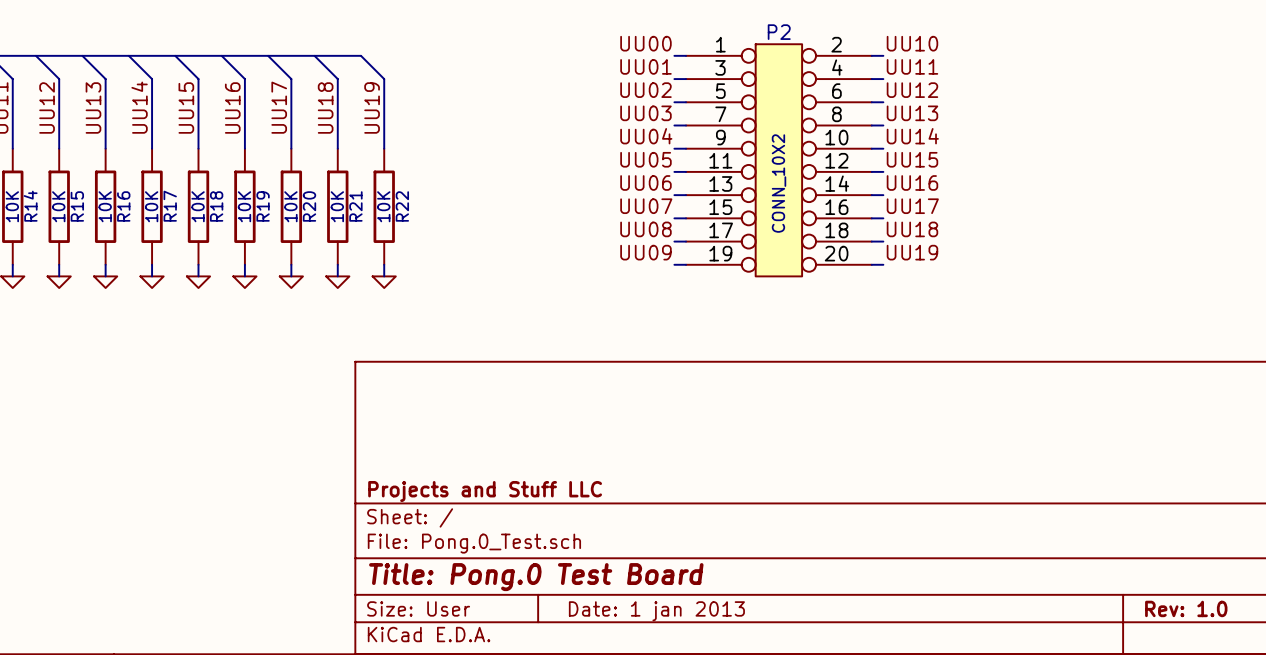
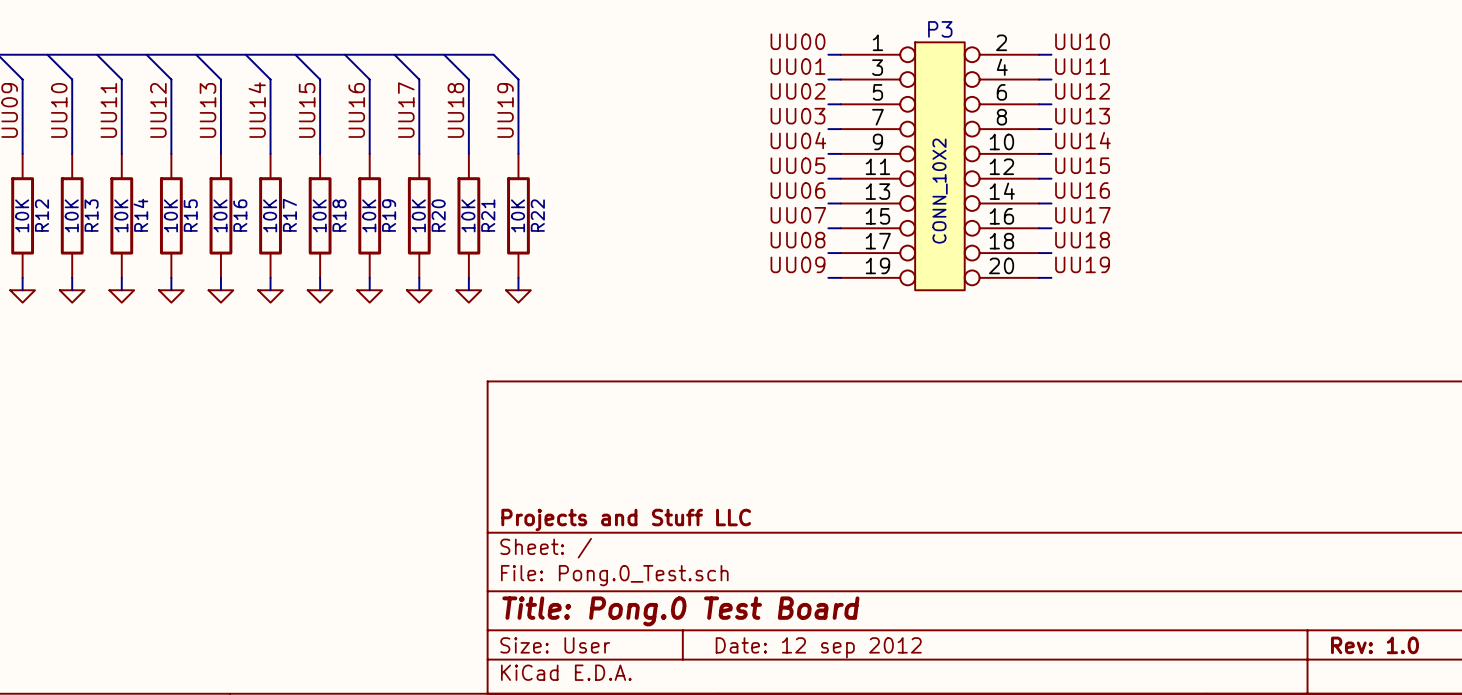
P2 name: P2 (779, 32) -> P3 (940, 29)
title block: Date: 1 jan 2013 (656, 611) -> Date: 12 sep 2012 (818, 647)

